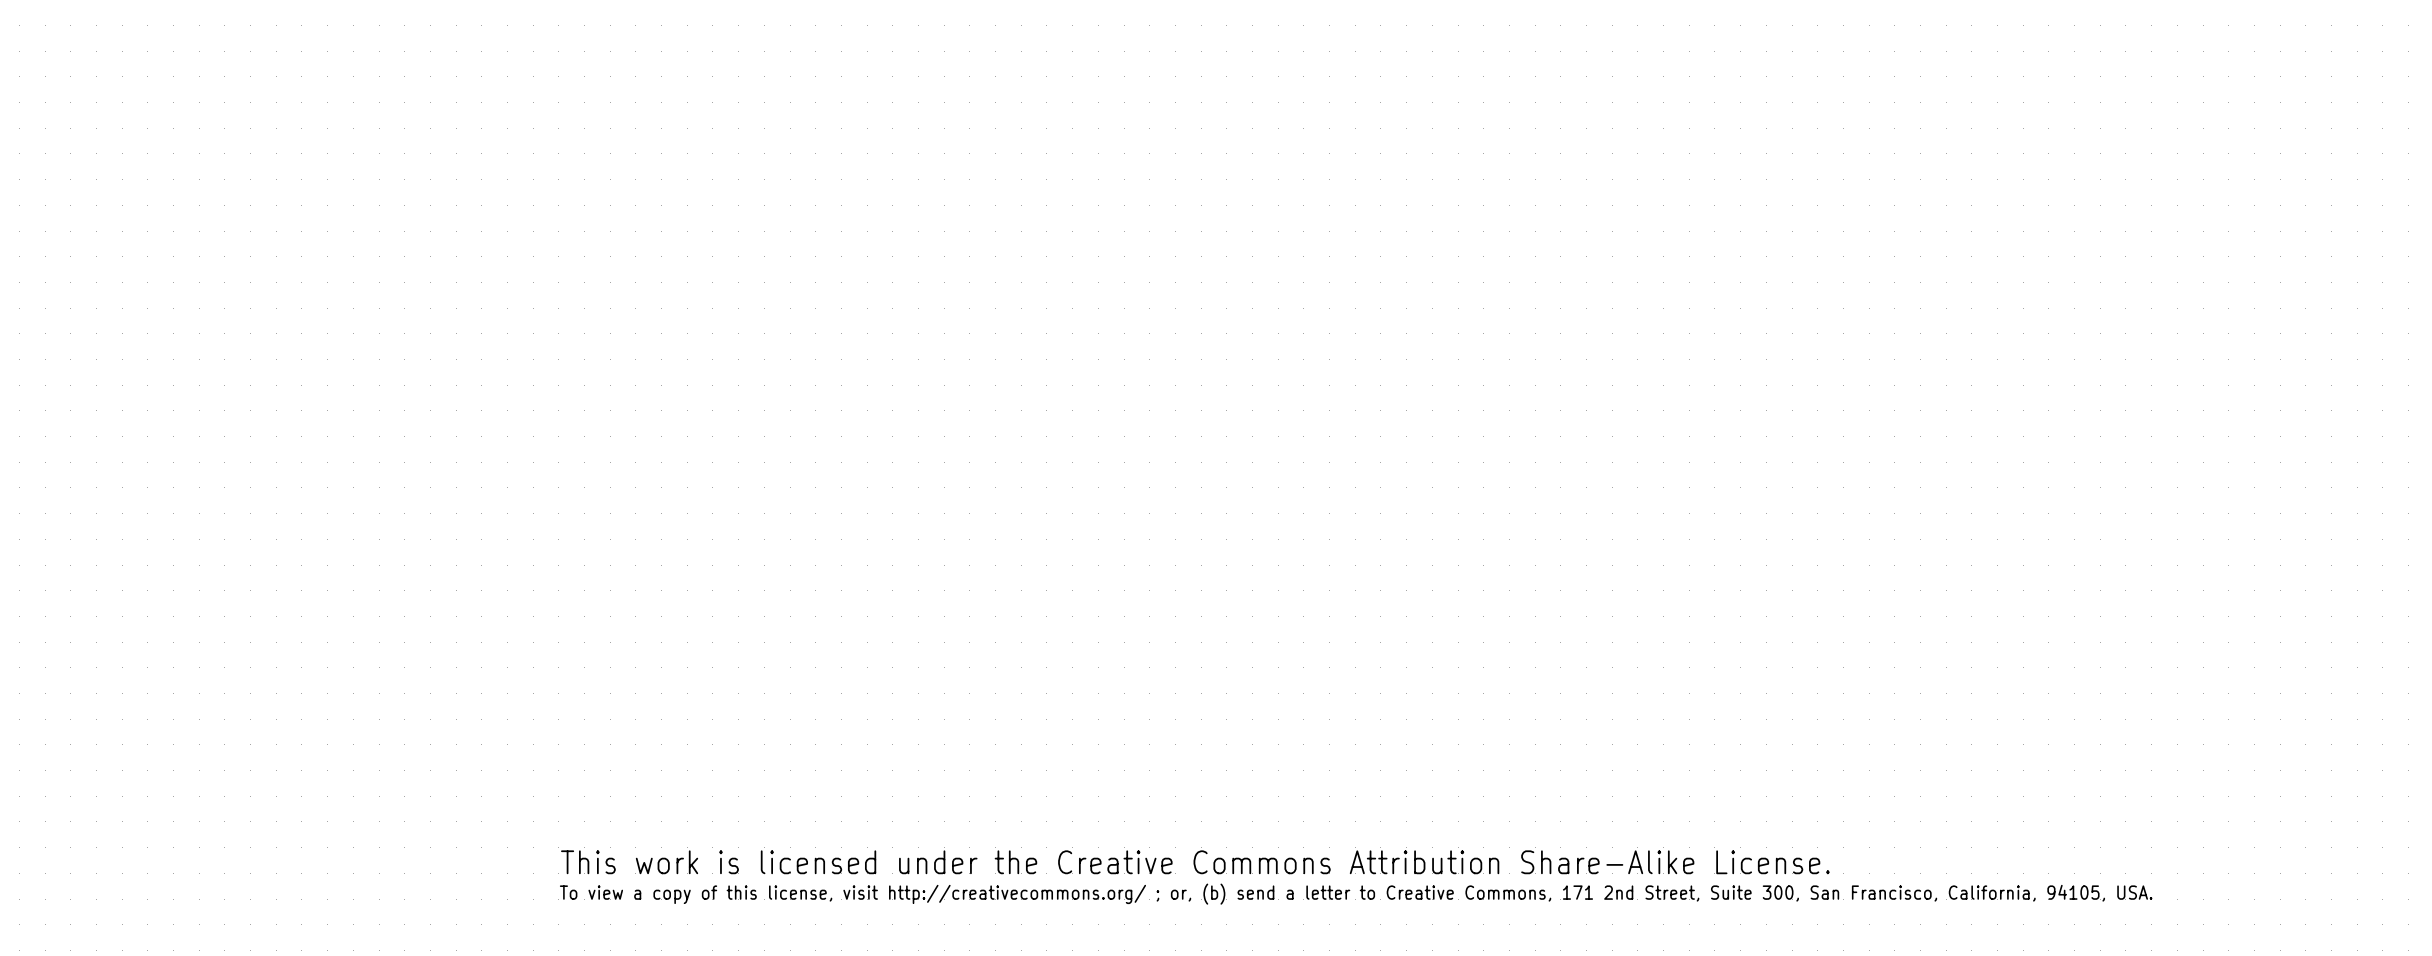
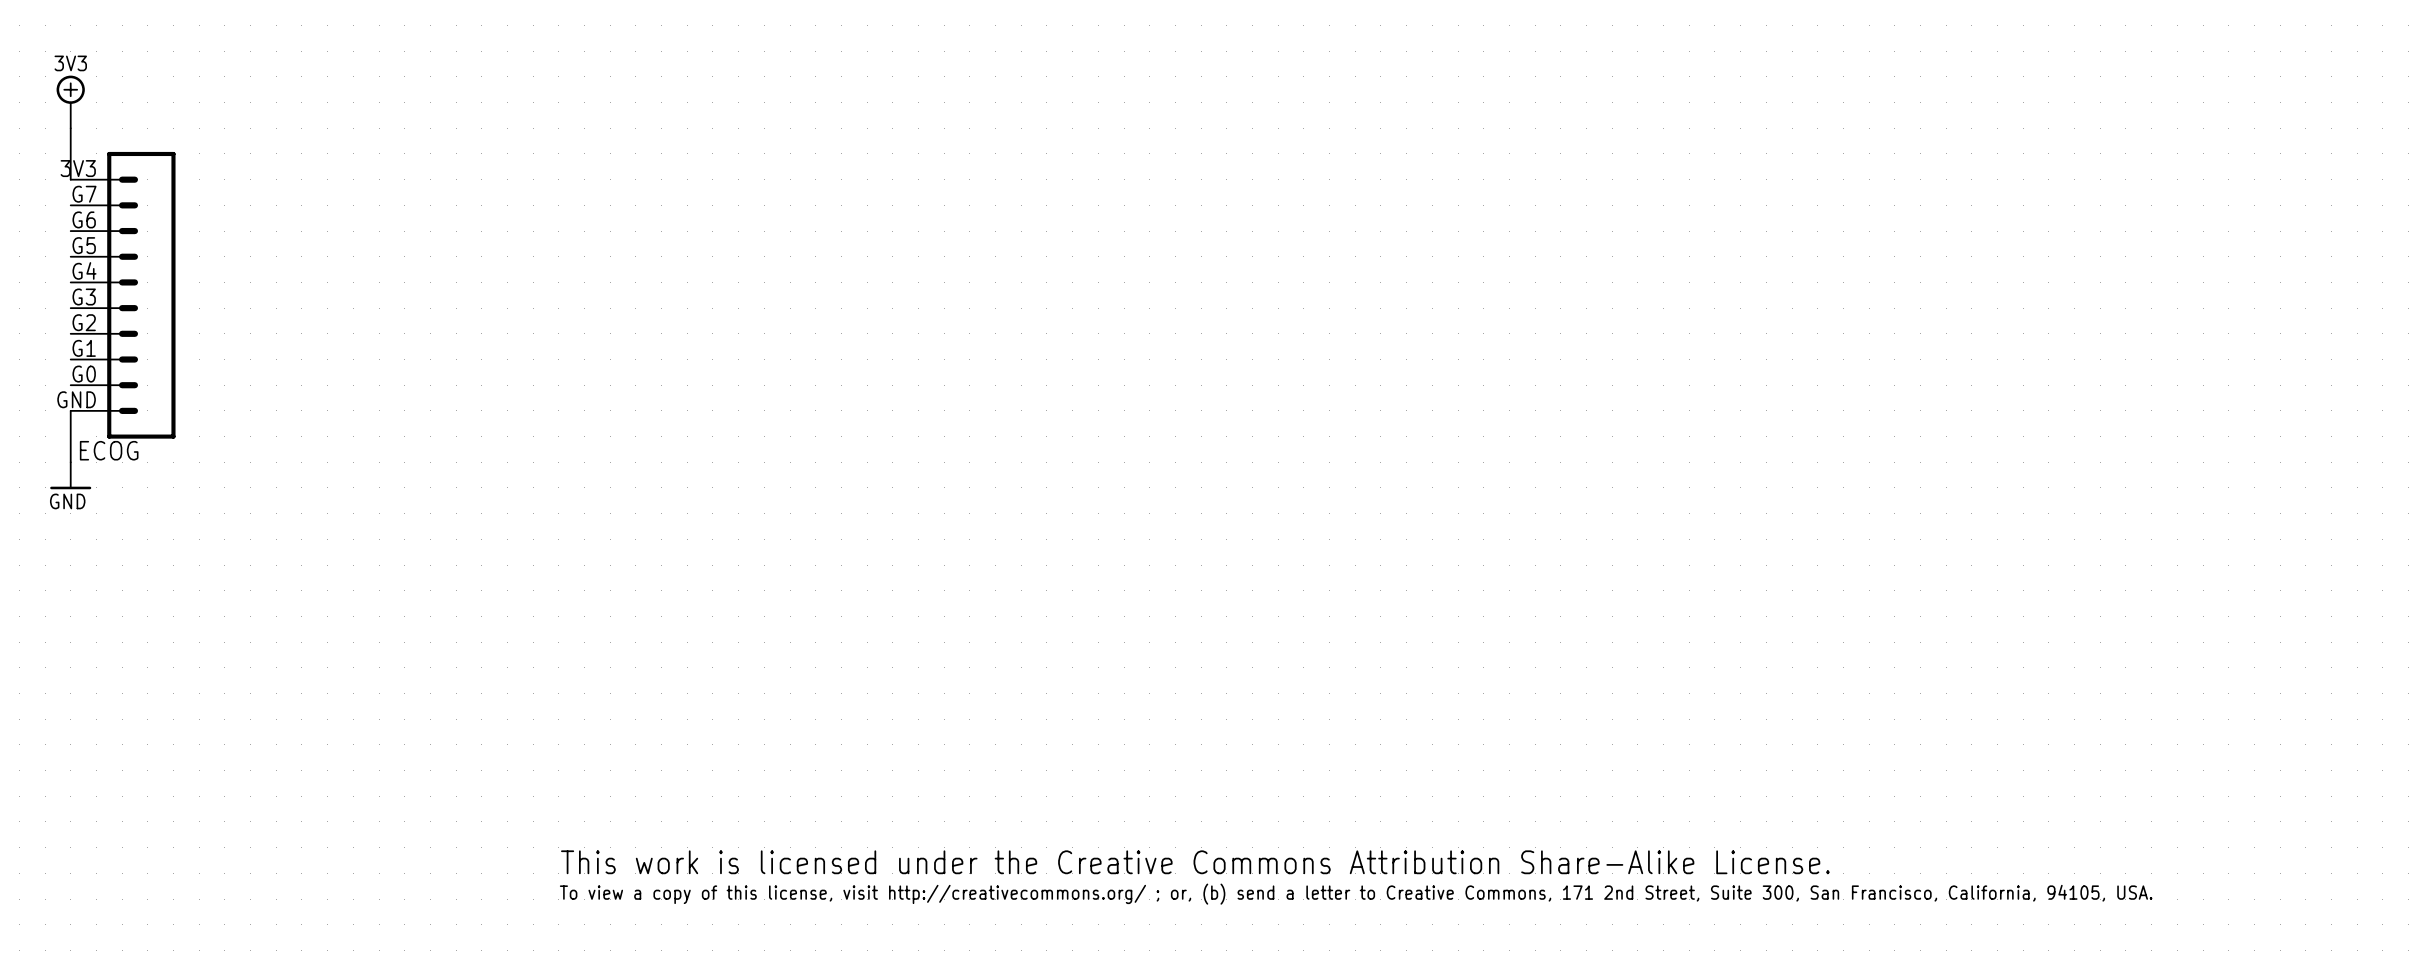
power symbol: none -> 3V3 (70, 101)
wire: none -> (70, 128) (70, 179)
ECOG: none -> (123, 295)
wire: none -> (70, 410) (70, 462)
power symbol: none -> GND (70, 475)

